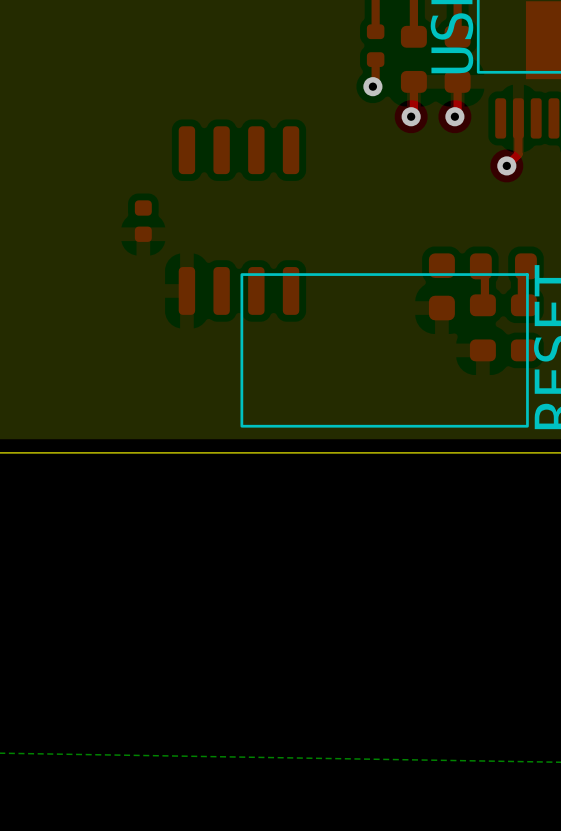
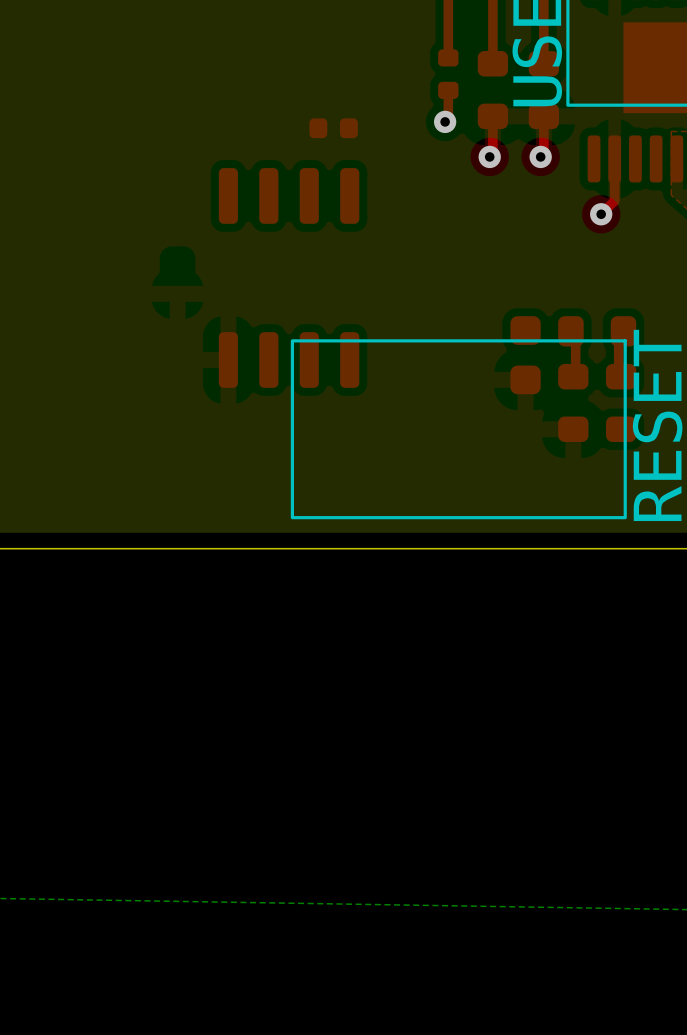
part rotation: 0° (143, 221) -> 90° clockwise (333, 128)
part position: (143, 221) -> (333, 128)

